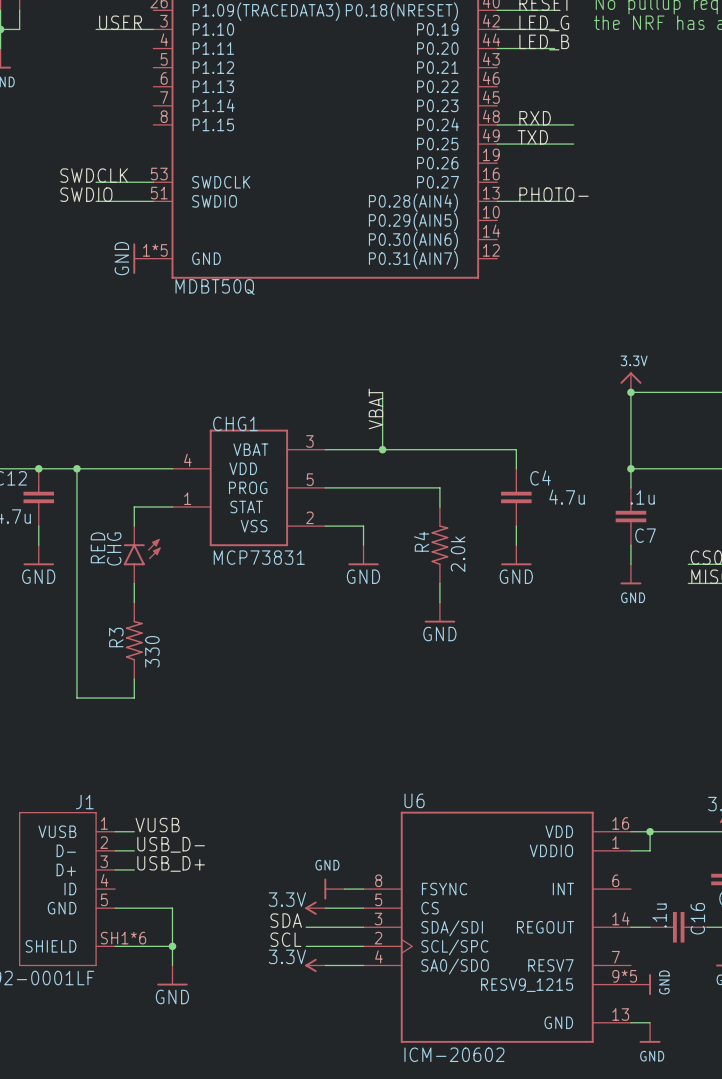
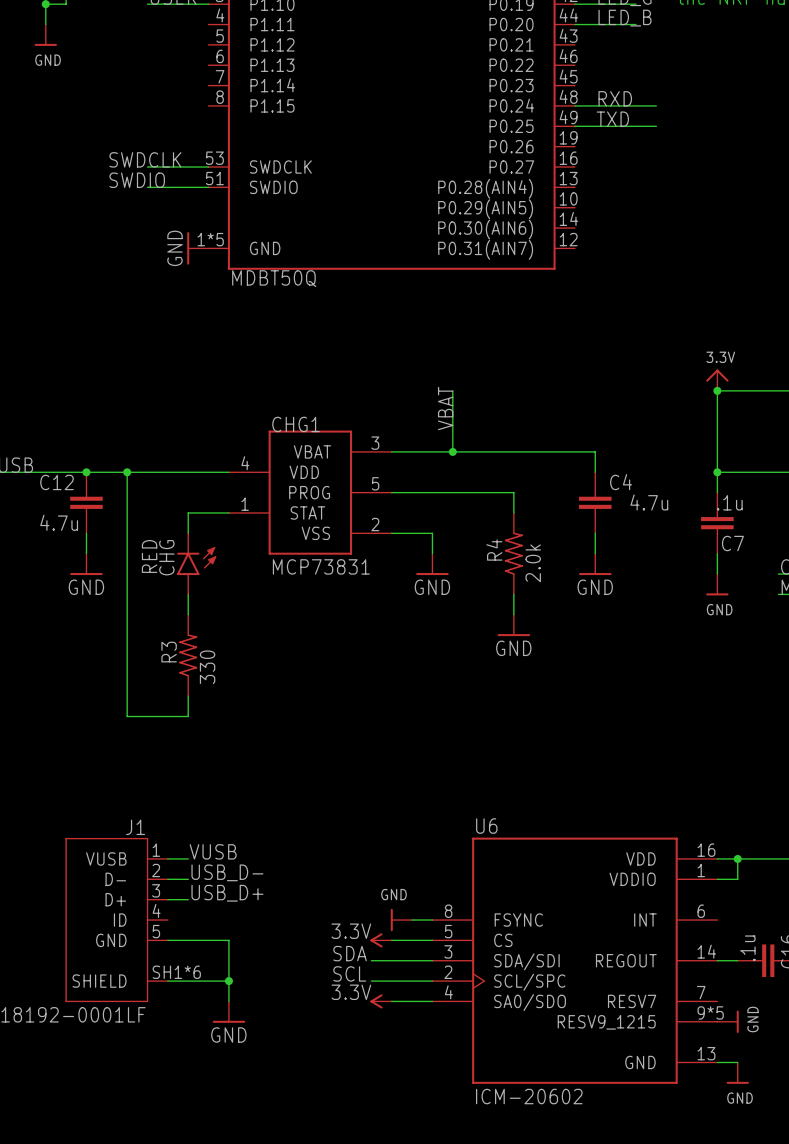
label: PHOTO- (554, 194) -> none
wire: (497, 201) (573, 201) -> none

